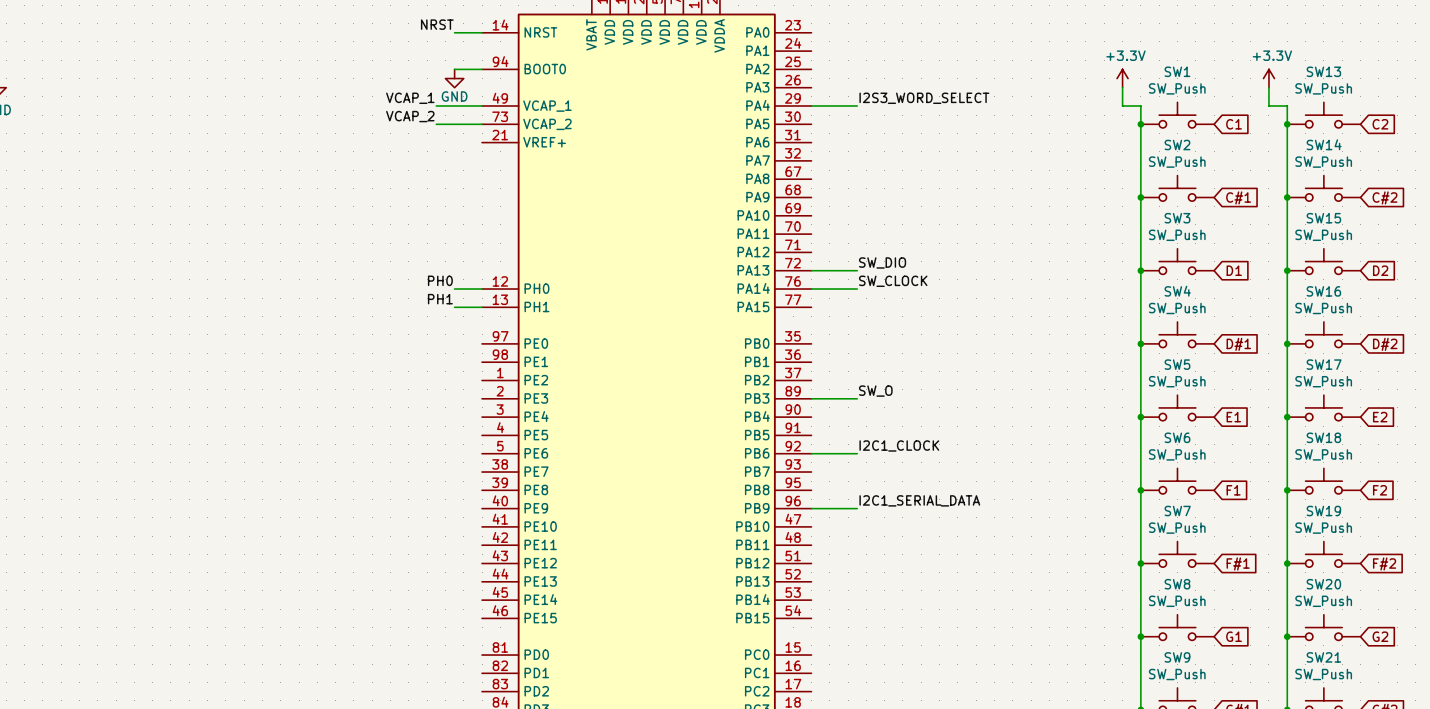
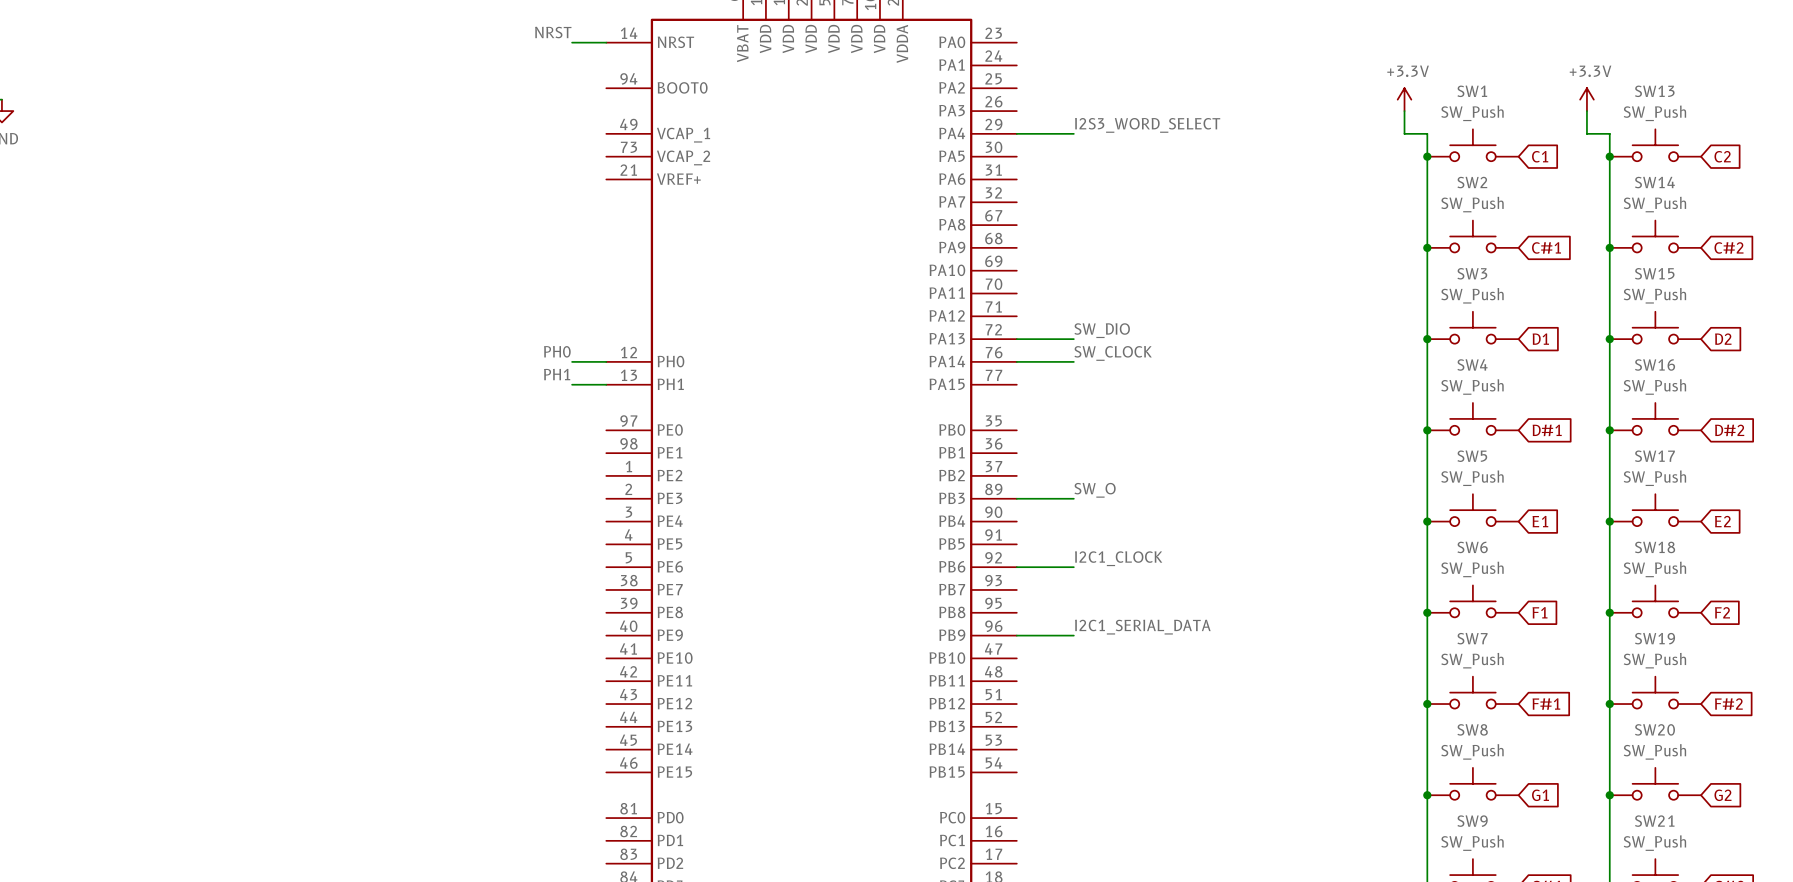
wire: (454, 69) (482, 69) -> none
power symbol: GND (454, 78) -> none
label: VCAP_1 (410, 98) -> none
wire: (436, 106) (482, 106) -> none
label: VCAP_2 (410, 116) -> none
wire: (436, 124) (482, 124) -> none

